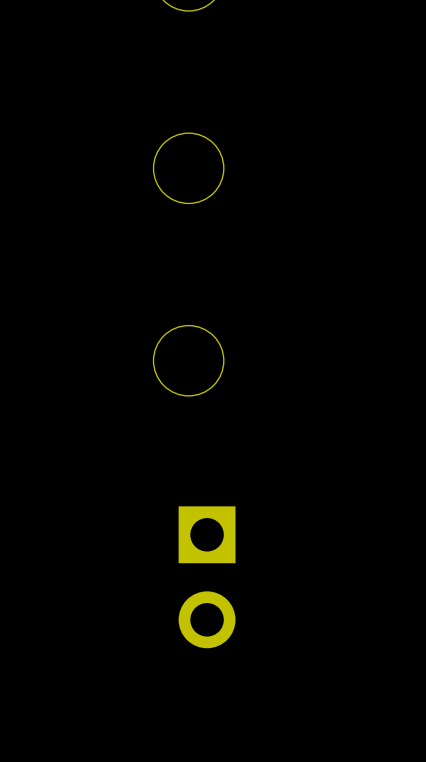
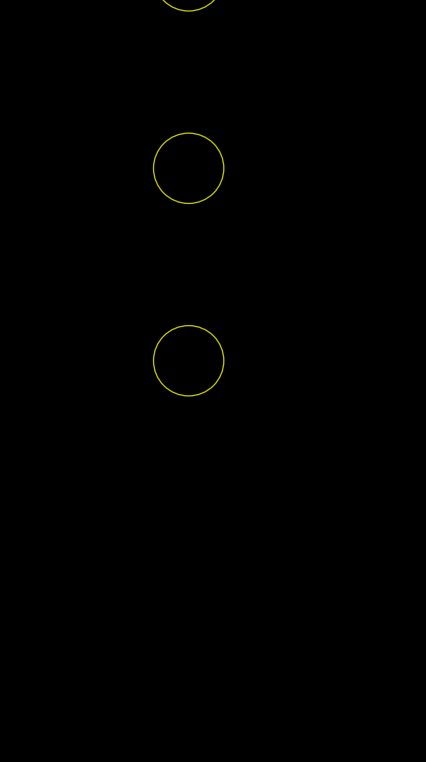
part: (207, 577) -> none

